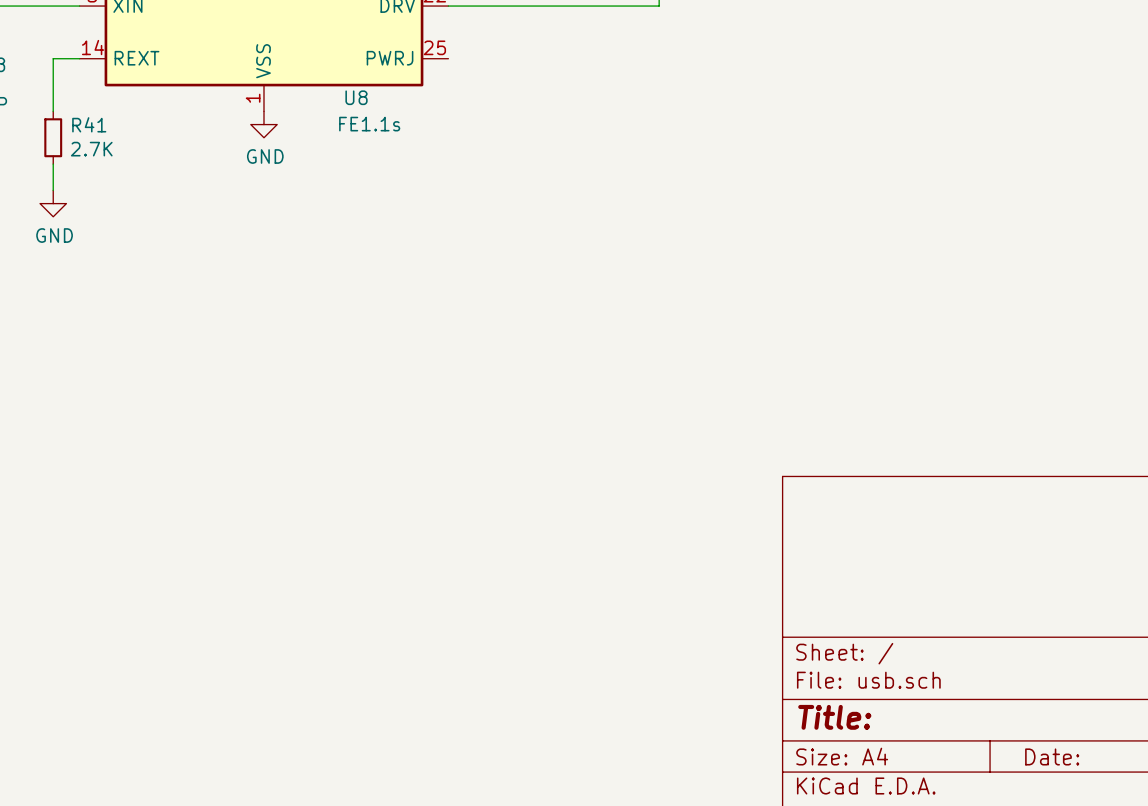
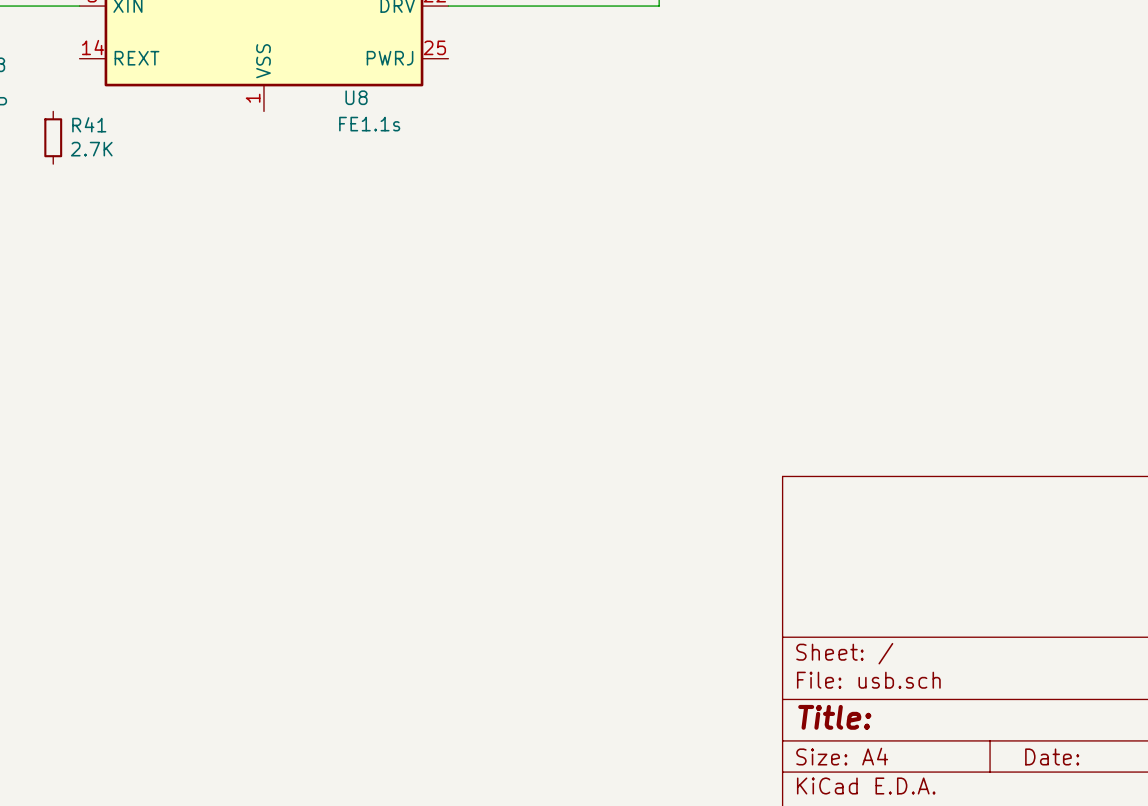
wire: (79, 58) (53, 58) (53, 111) -> none
power symbol: GND (263, 124) -> none
wire: (53, 164) (53, 190) -> none
power symbol: GND (53, 203) -> none

